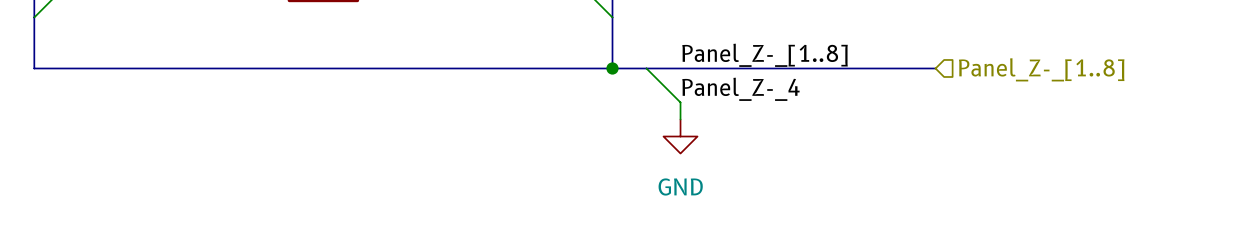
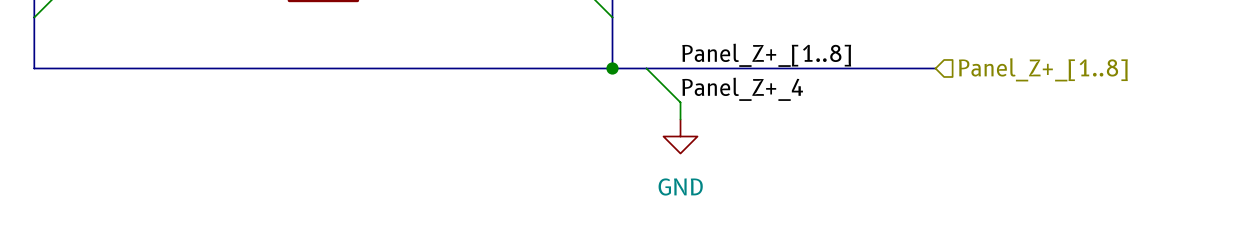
label: Panel_Z-_[1..8] (765, 55) -> Panel_Z+_[1..8] (766, 55)
hierarchical label: Panel_Z-_[1..8] (1041, 69) -> Panel_Z+_[1..8] (1043, 69)
label: Panel_Z-_4 (740, 89) -> Panel_Z+_4 (742, 89)

